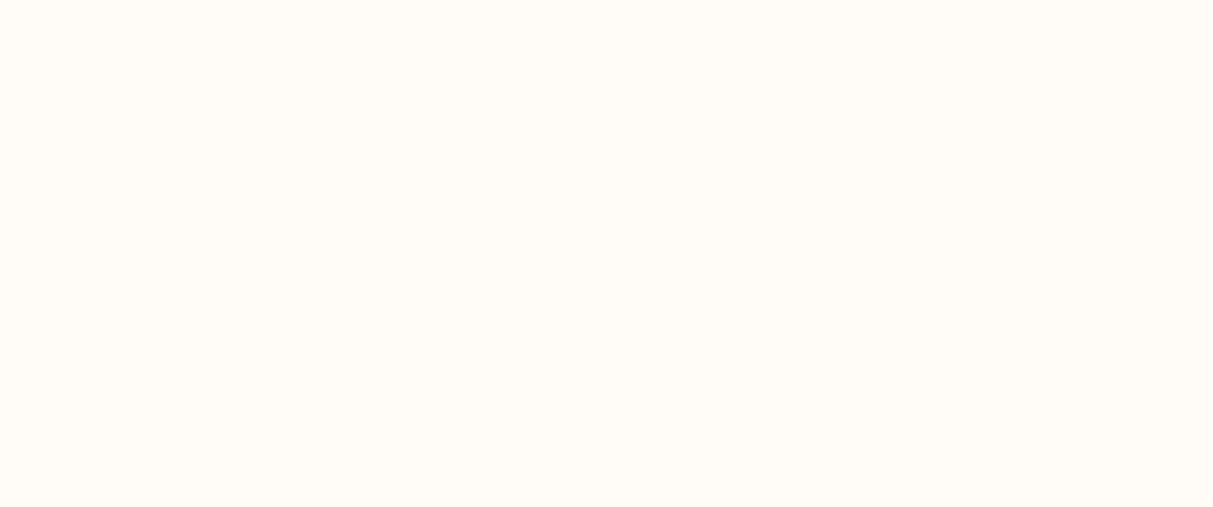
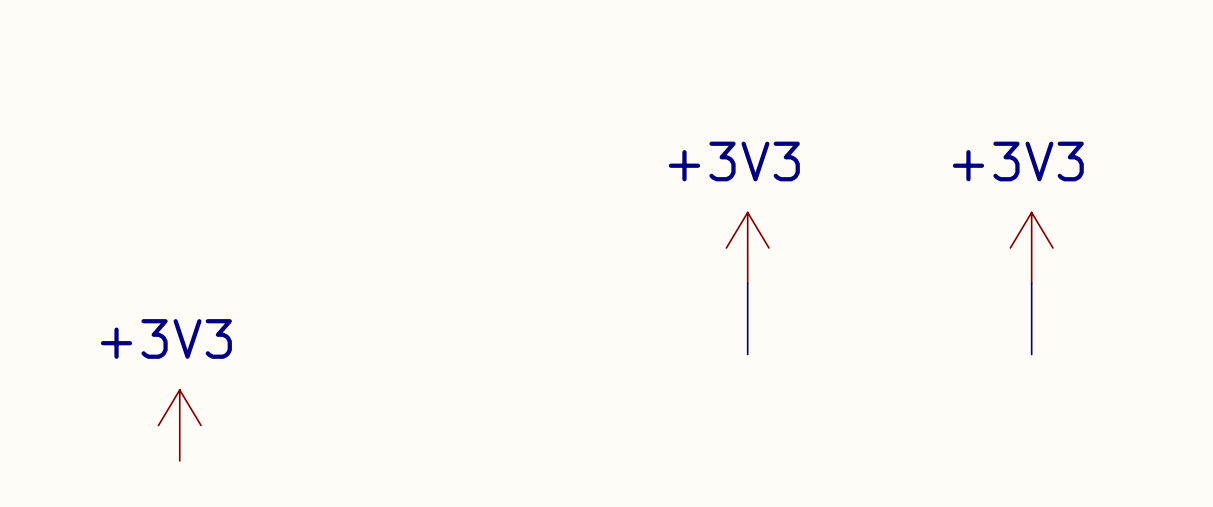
power symbol: none -> +3V3 (747, 248)
power symbol: none -> +3V3 (1031, 248)
wire: none -> (747, 283) (747, 354)
wire: none -> (1031, 283) (1031, 354)
power symbol: none -> +3V3 (179, 425)

